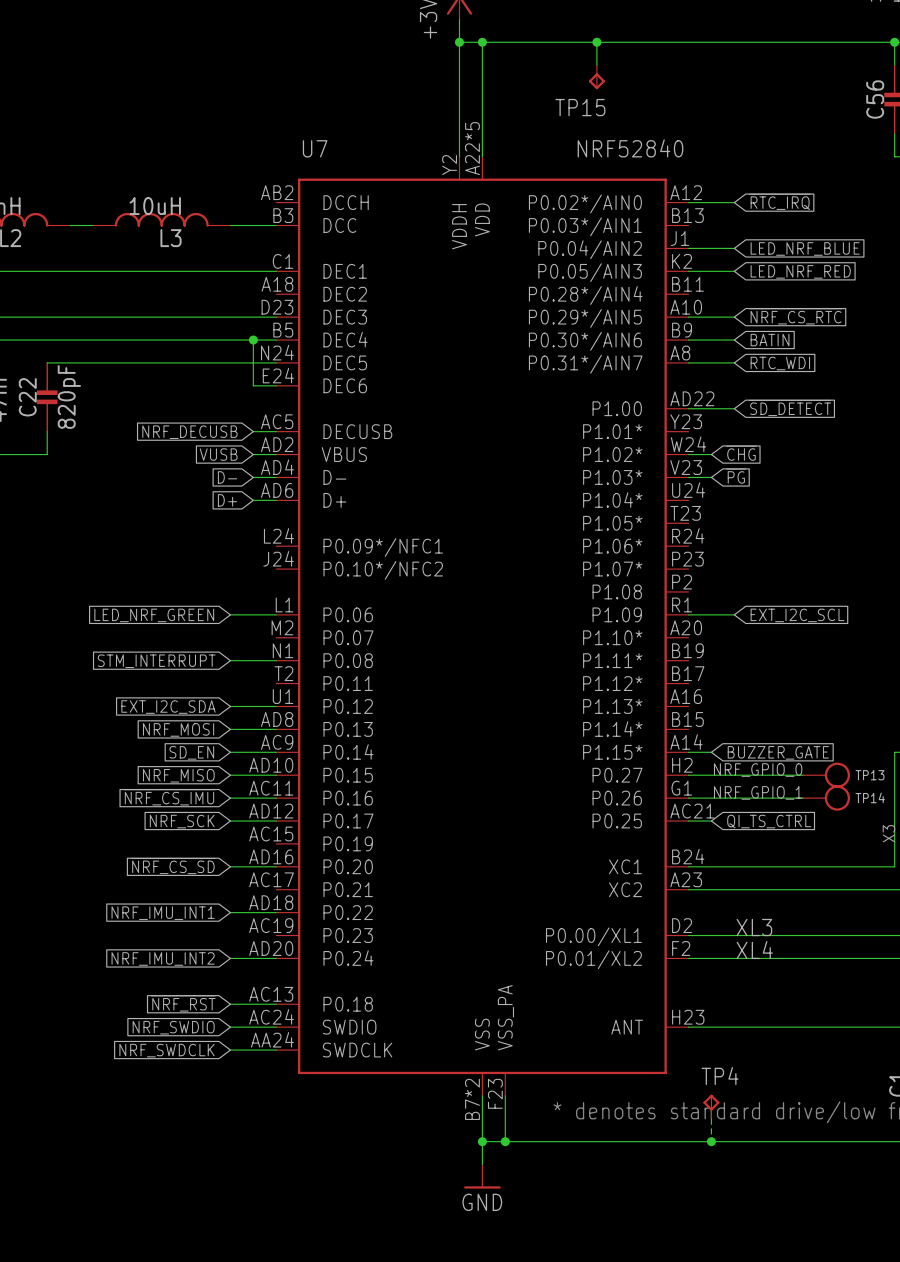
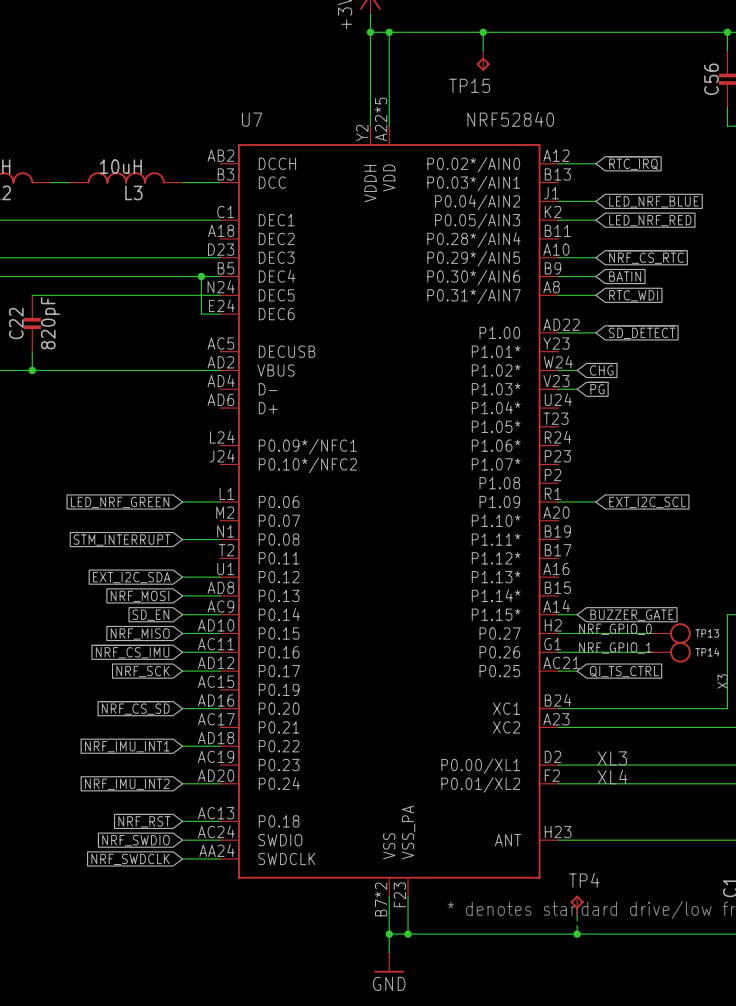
wire: (253, 431) (276, 431) -> none
global label: NRF_DECUSB (189, 432) -> none
wire: none -> (32, 370) (201, 370)
junction: none -> (32, 370)
global label: VUSB (218, 454) -> none
global label: D- (227, 477) -> none
wire: (253, 477) (276, 477) -> none
global label: D+ (227, 500) -> none
wire: (253, 500) (276, 500) -> none

